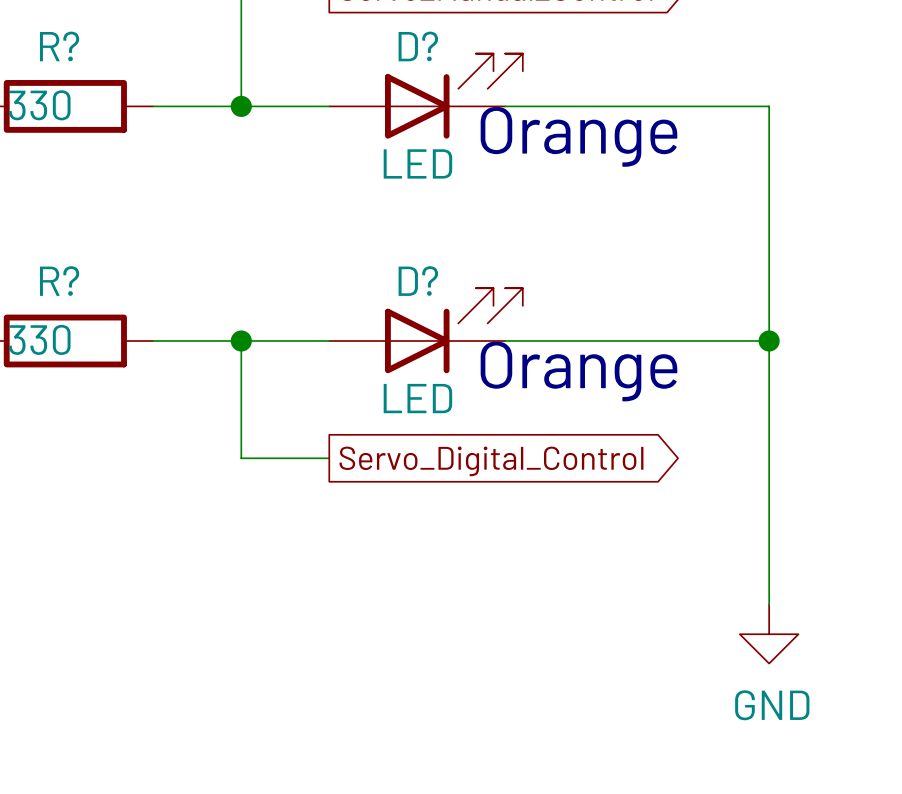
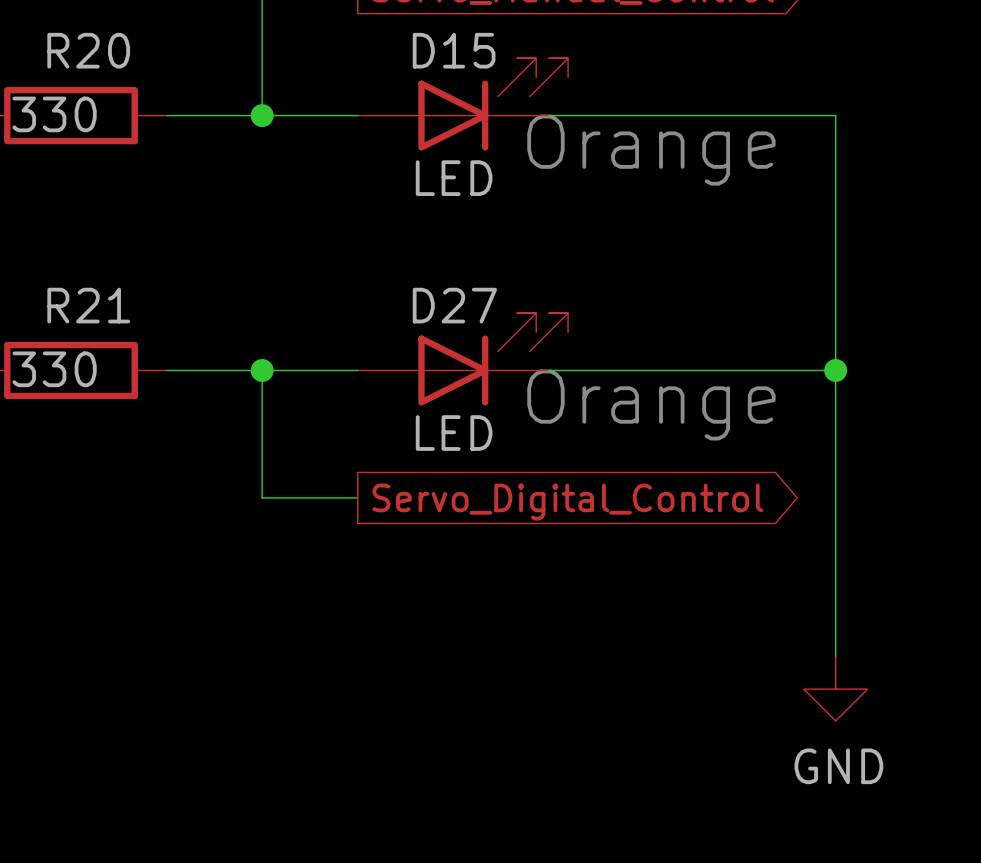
R? name: R? (59, 46) -> R20 (88, 50)
D? name: D? (418, 46) -> D15 (454, 50)
R? name: R? (59, 281) -> R21 (88, 305)
D? name: D? (418, 281) -> D27 (454, 305)

